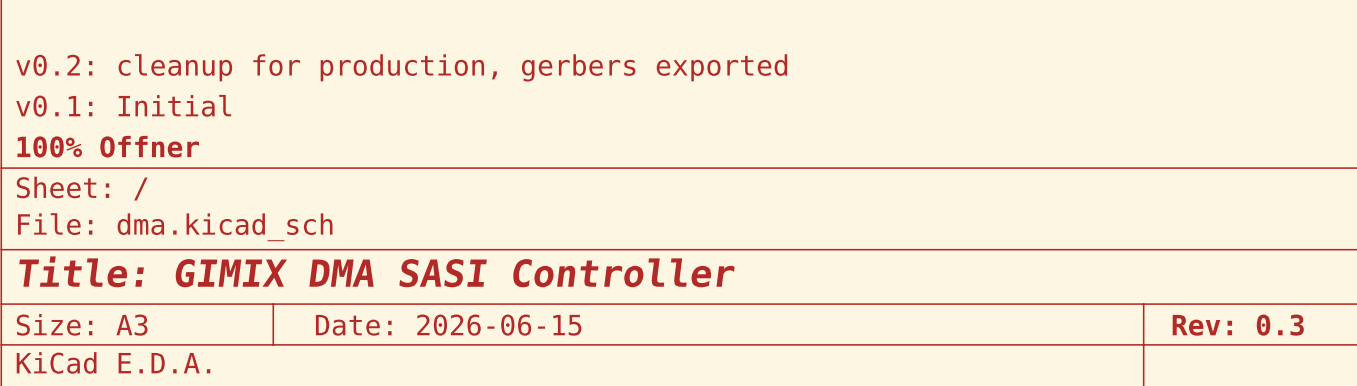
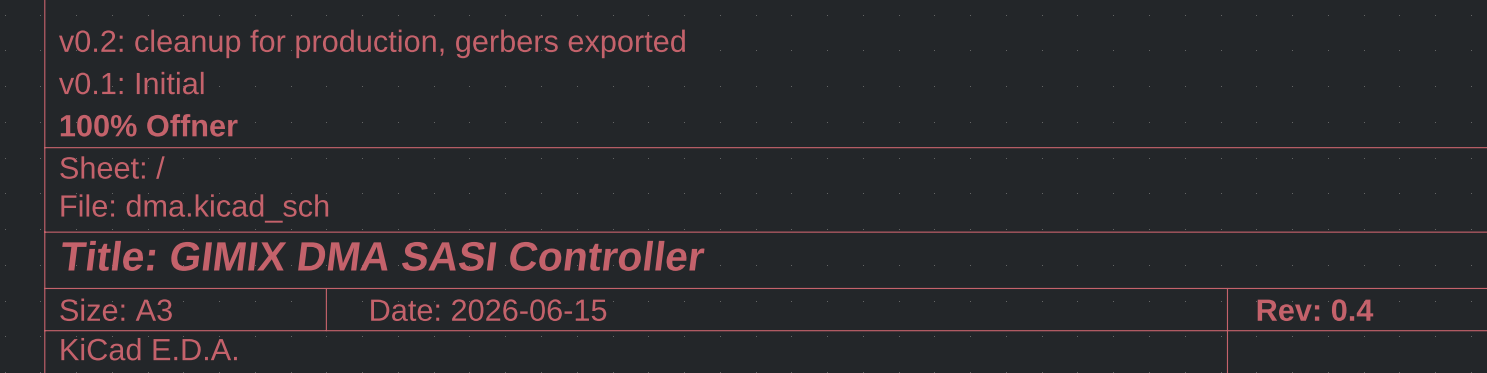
title block: Rev: 0.3 (1238, 325) -> Rev: 0.4 (1315, 310)

